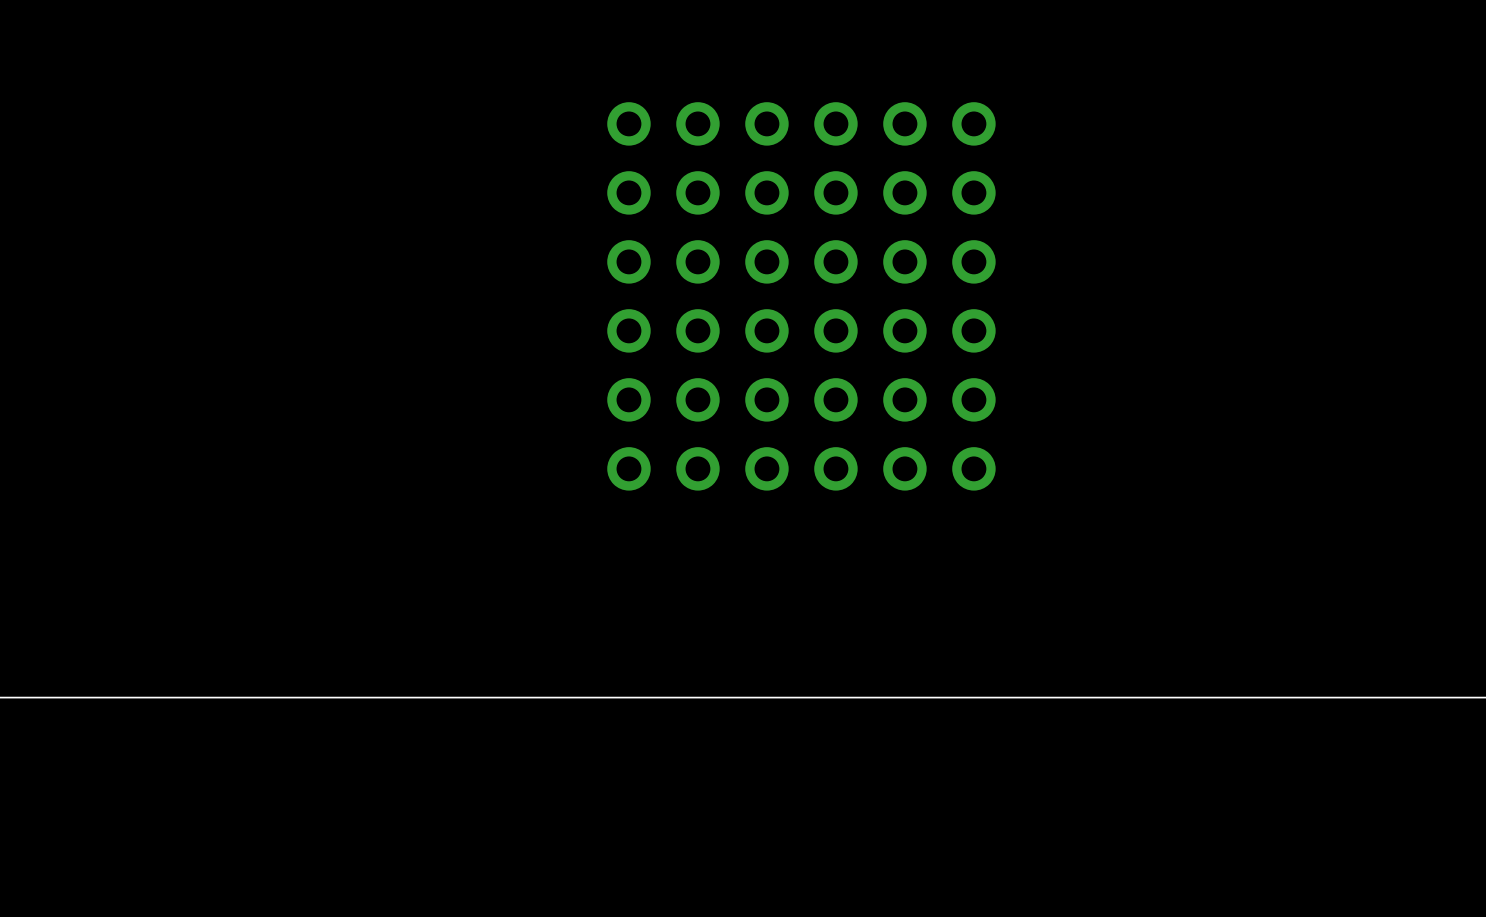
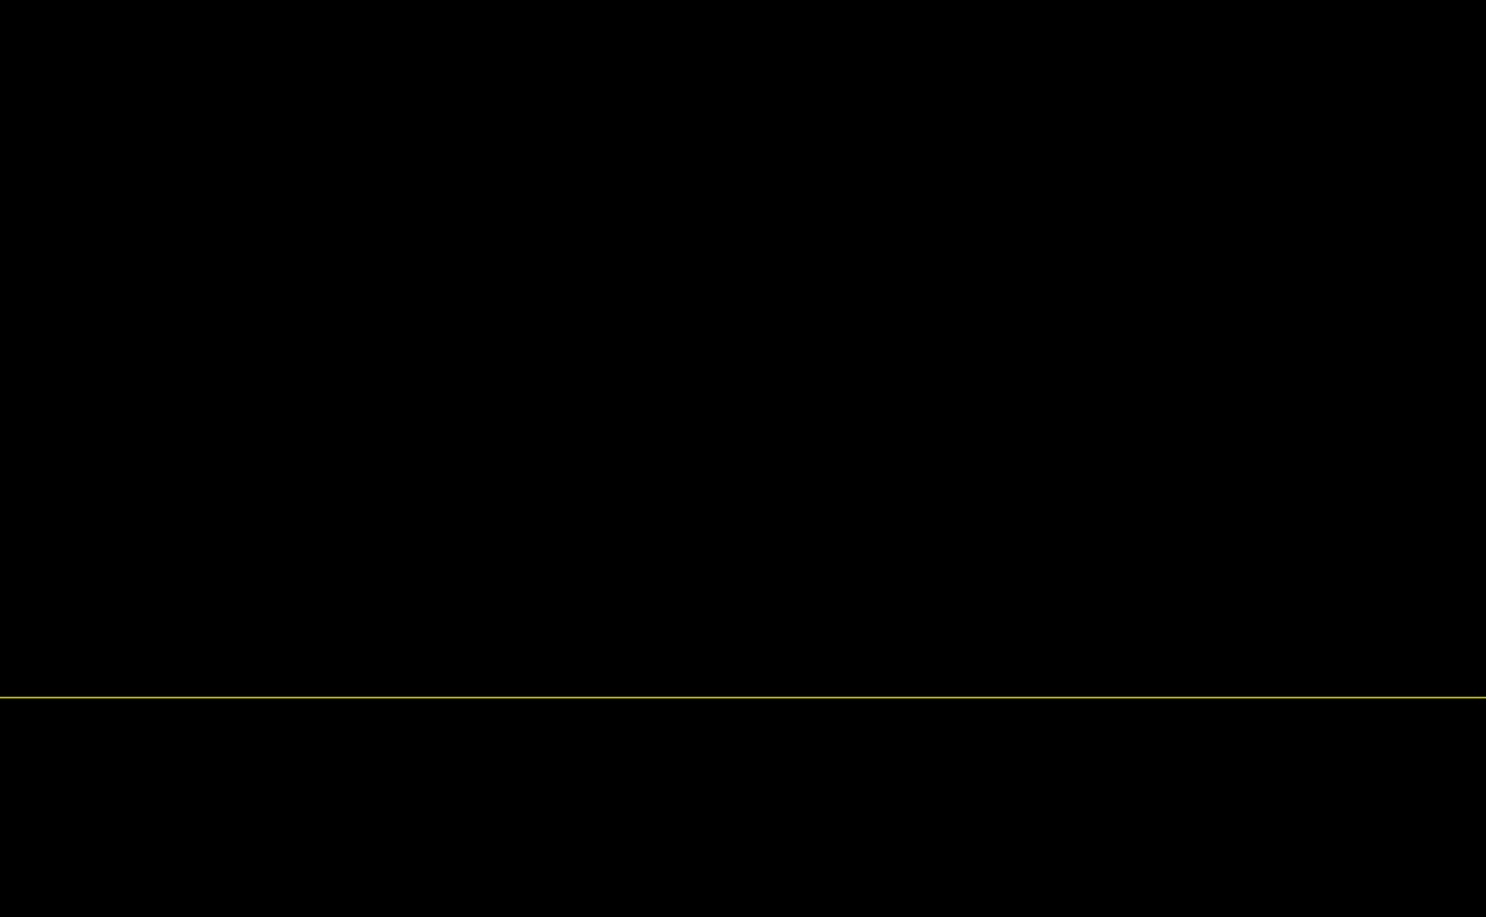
via: (628, 123) -> none
via: (697, 123) -> none
via: (766, 123) -> none
via: (835, 123) -> none
via: (904, 123) -> none
via: (973, 123) -> none
via: (628, 192) -> none
via: (697, 192) -> none
via: (766, 192) -> none
via: (835, 192) -> none
via: (904, 192) -> none
via: (973, 192) -> none
via: (628, 261) -> none
via: (697, 261) -> none
via: (766, 261) -> none
via: (835, 261) -> none
via: (904, 261) -> none
via: (973, 261) -> none
via: (628, 330) -> none
via: (697, 330) -> none
via: (766, 330) -> none
via: (835, 330) -> none
via: (904, 330) -> none
via: (973, 330) -> none
via: (628, 399) -> none
via: (697, 399) -> none
via: (766, 399) -> none
via: (835, 399) -> none
via: (904, 399) -> none
via: (973, 399) -> none
via: (628, 468) -> none
via: (697, 468) -> none
via: (766, 468) -> none
via: (835, 468) -> none
via: (904, 468) -> none
via: (973, 468) -> none

